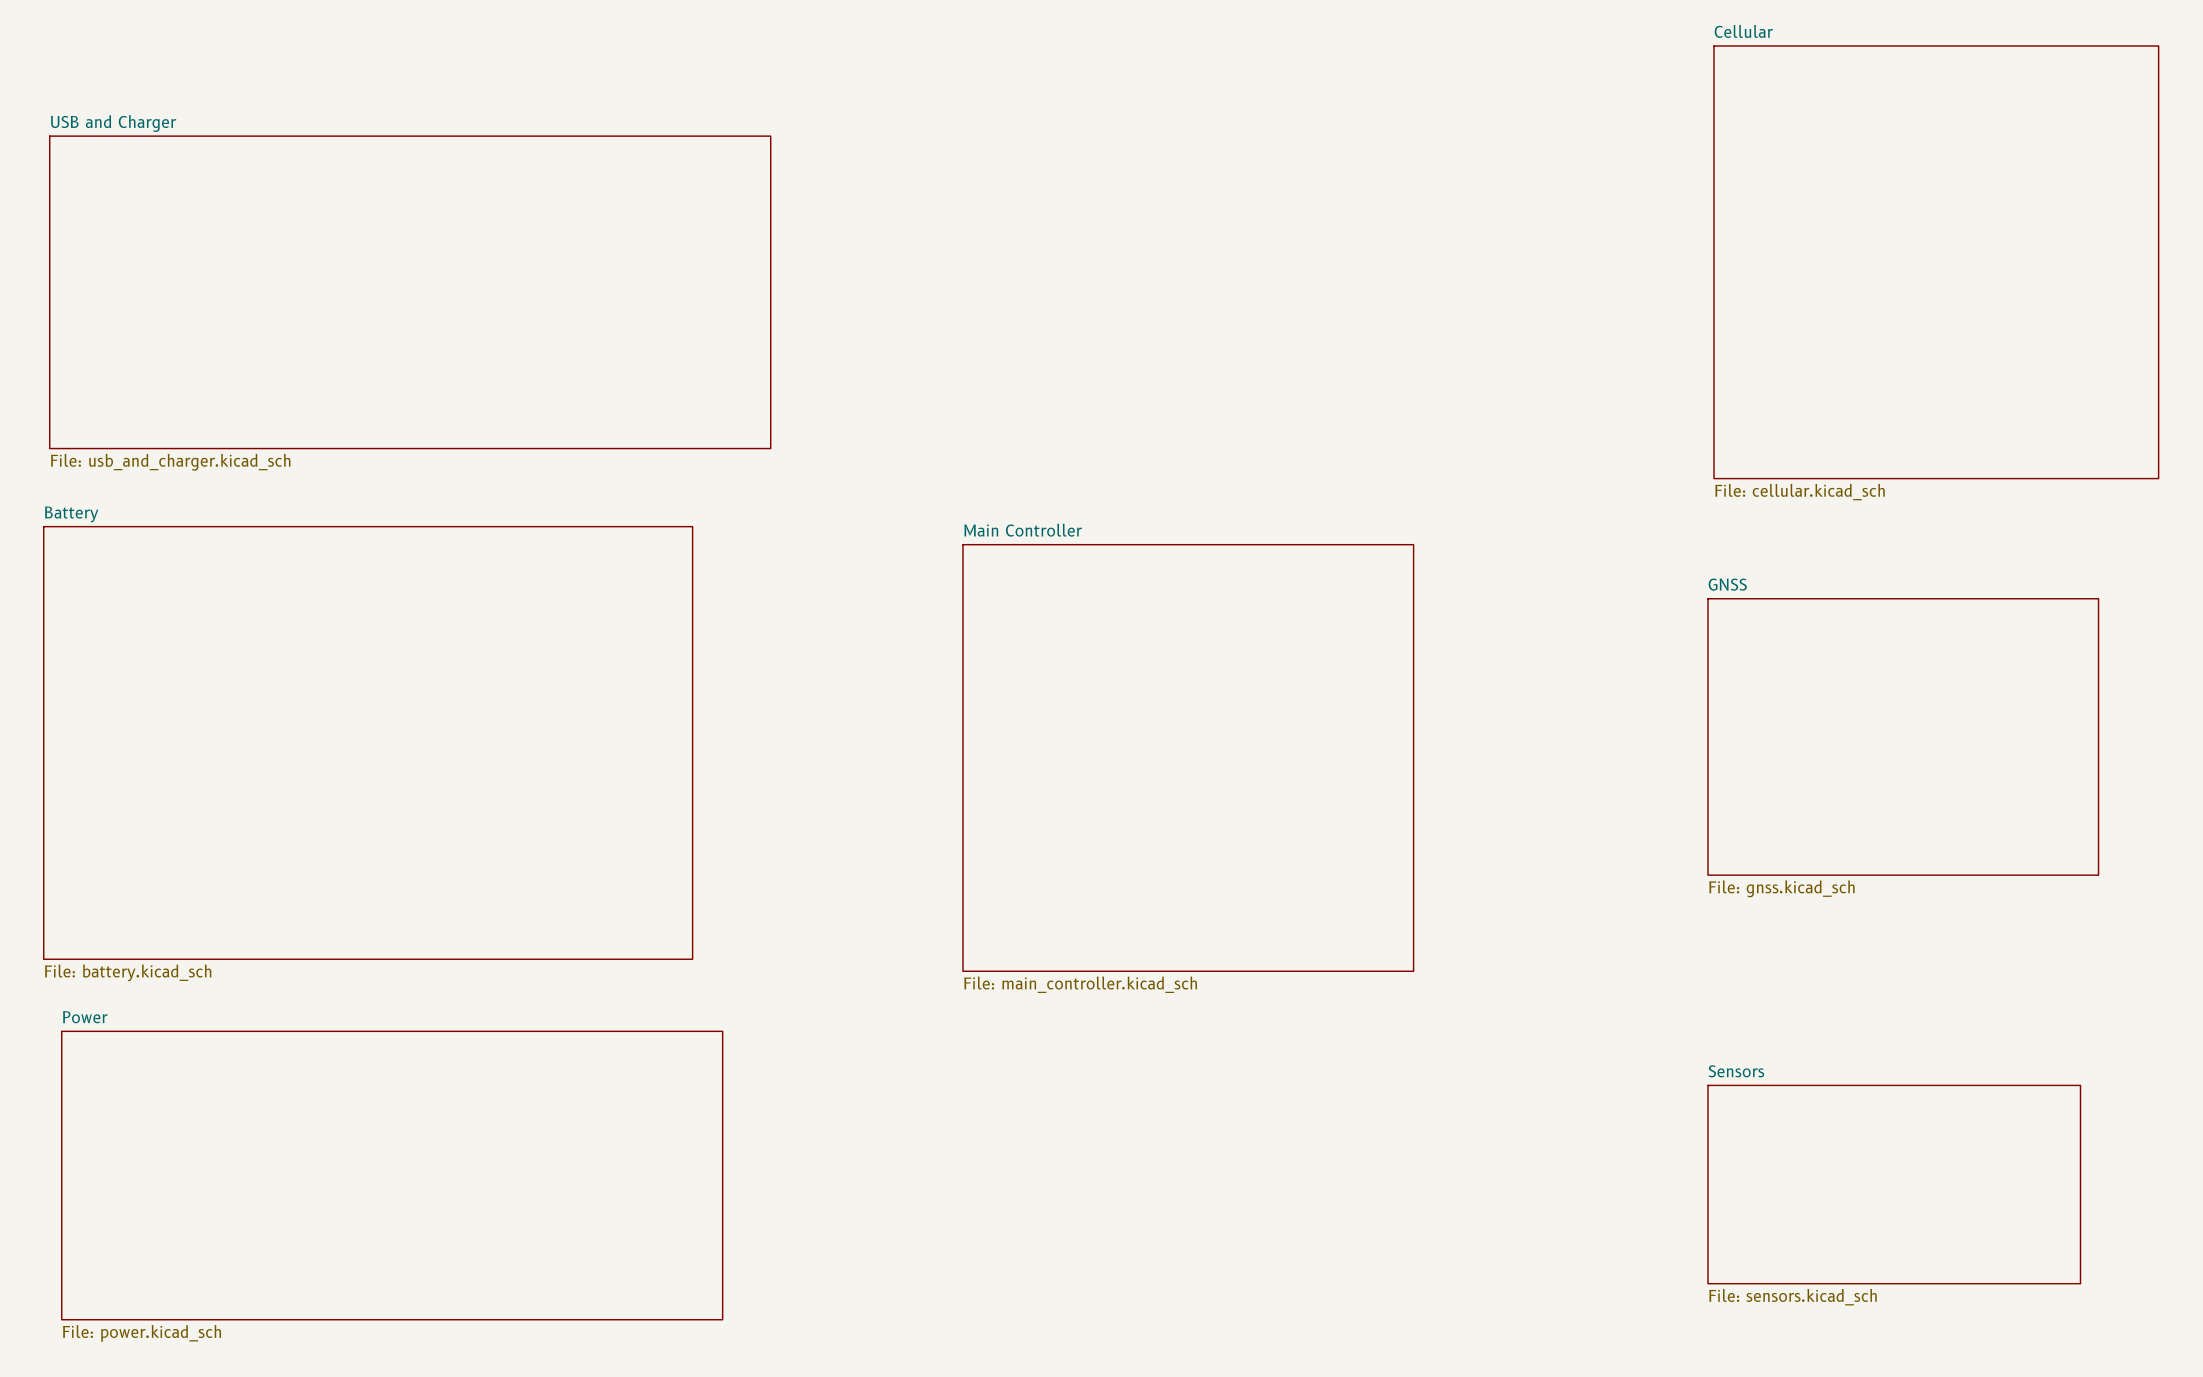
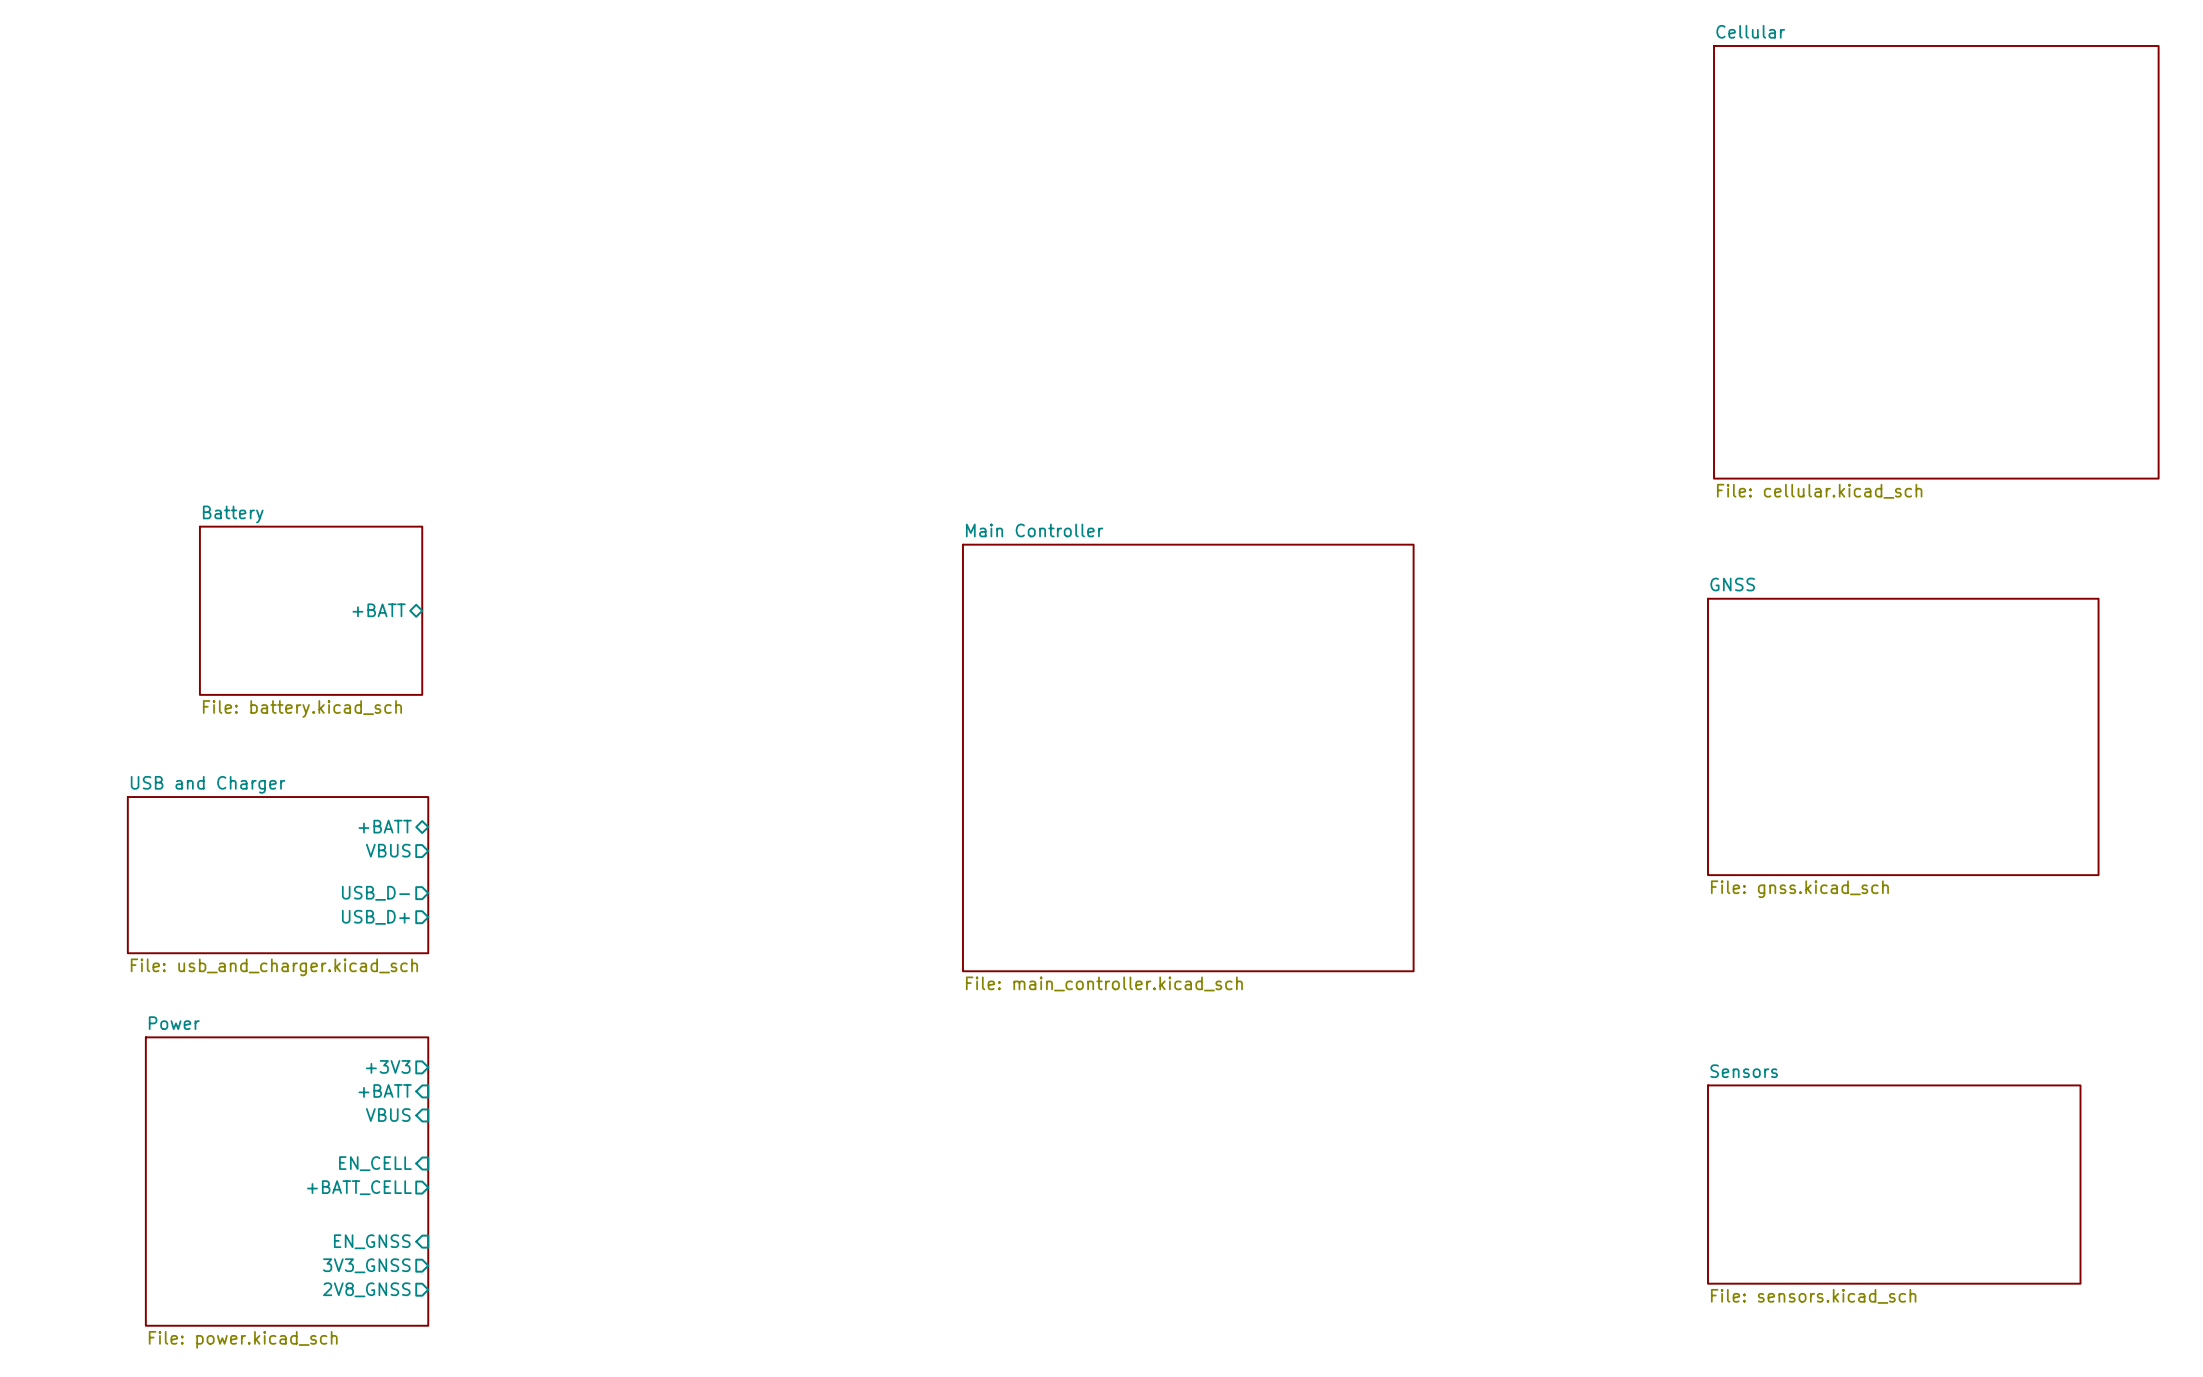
sheet USB and Charger: File: usb_and_charger.kicad_sch (410, 292) -> none
sheet Battery: none -> File: battery.kicad_sch (311, 610)
sheet pin: none -> +BATT (379, 610)
sheet Battery: File: battery.kicad_sch (368, 742) -> none
sheet pin: none -> +BATT (385, 826)
sheet pin: none -> VBUS (388, 850)
sheet USB and Charger: none -> File: usb_and_charger.kicad_sch (278, 875)
sheet pin: none -> USB_D- (375, 893)
sheet pin: none -> USB_D+ (375, 917)
sheet pin: none -> +3V3 (388, 1066)
sheet pin: none -> +BATT (385, 1090)
sheet pin: none -> VBUS (388, 1115)
sheet pin: none -> EN_CELL (375, 1163)
sheet Power: File: power.kicad_sch (392, 1175) -> none
sheet Power: none -> File: power.kicad_sch (287, 1181)
sheet pin: none -> +BATT_CELL (359, 1187)
sheet pin: none -> EN_GNSS (372, 1241)
sheet pin: none -> 3V3_GNSS (366, 1265)
sheet pin: none -> 2V8_GNSS (366, 1289)

